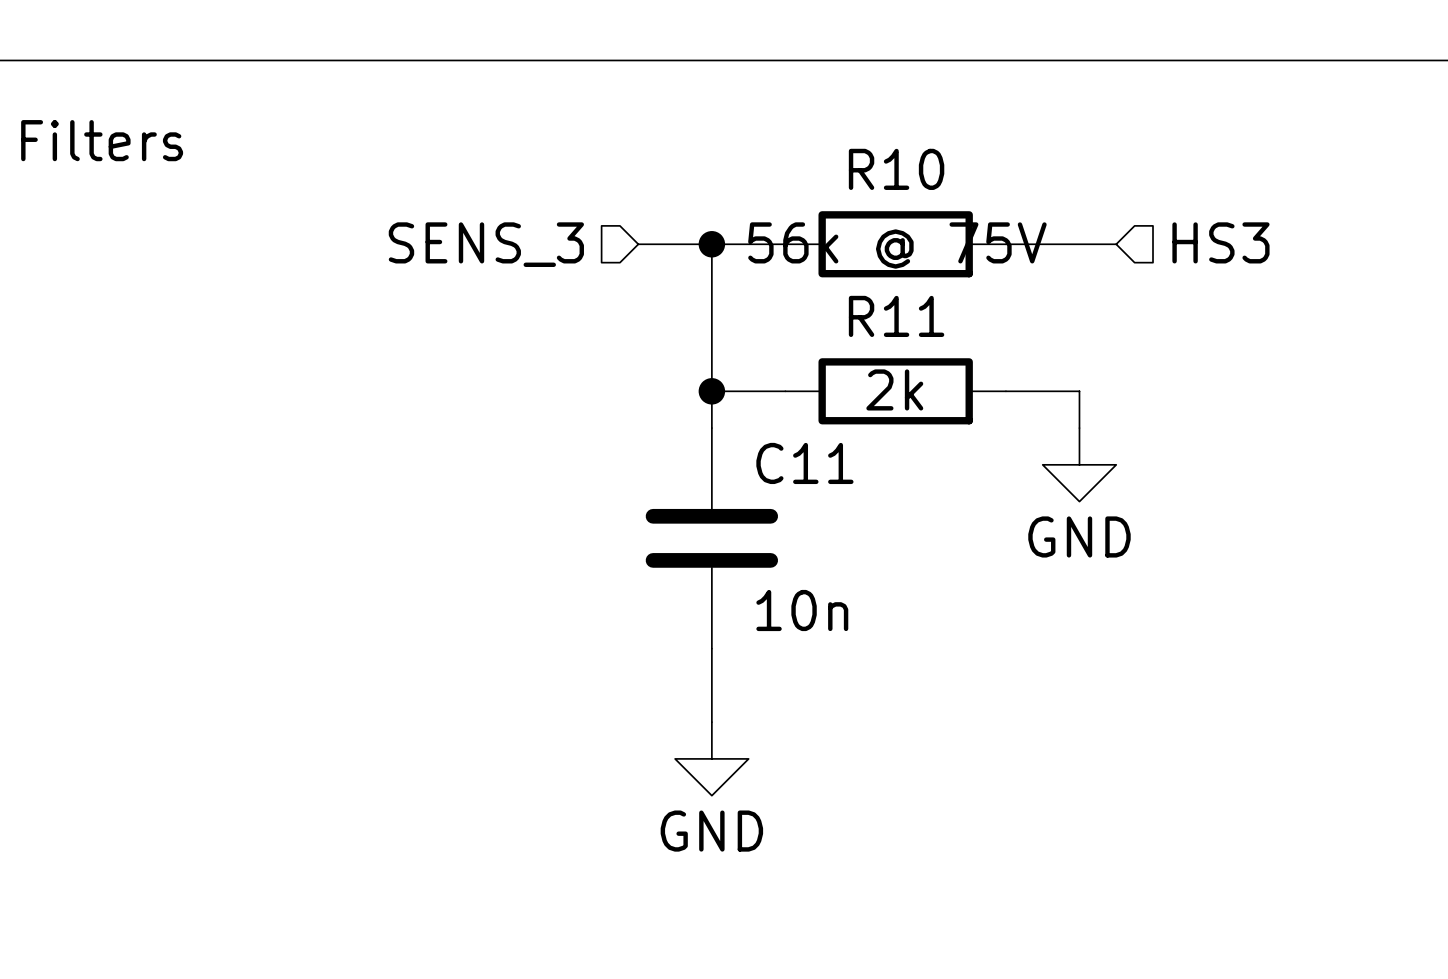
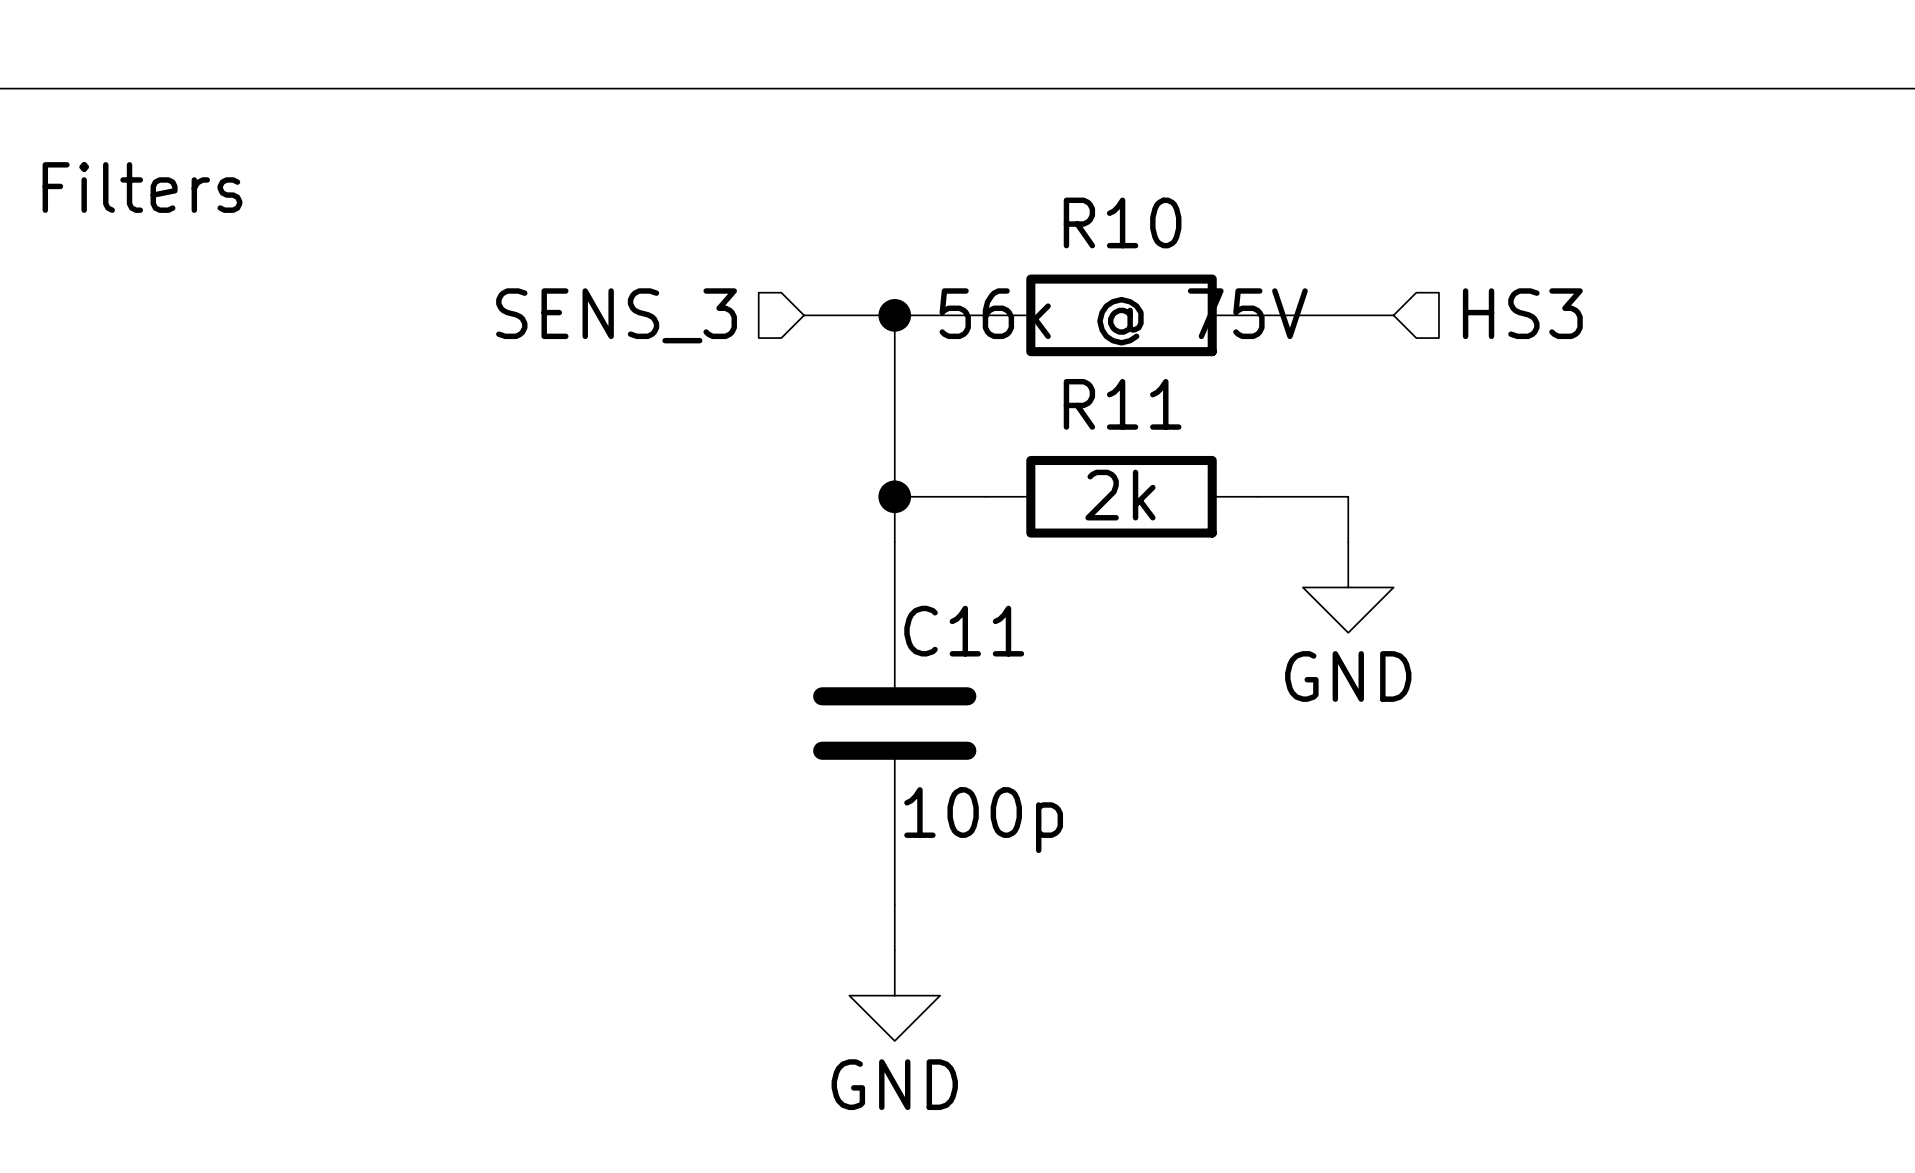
C11 symbol: [645, 428, 779, 649] -> [813, 542, 977, 905]
C11 value: 10n (802, 610) -> 100p (983, 820)
power symbol position: GND (711, 758) -> GND (894, 995)

